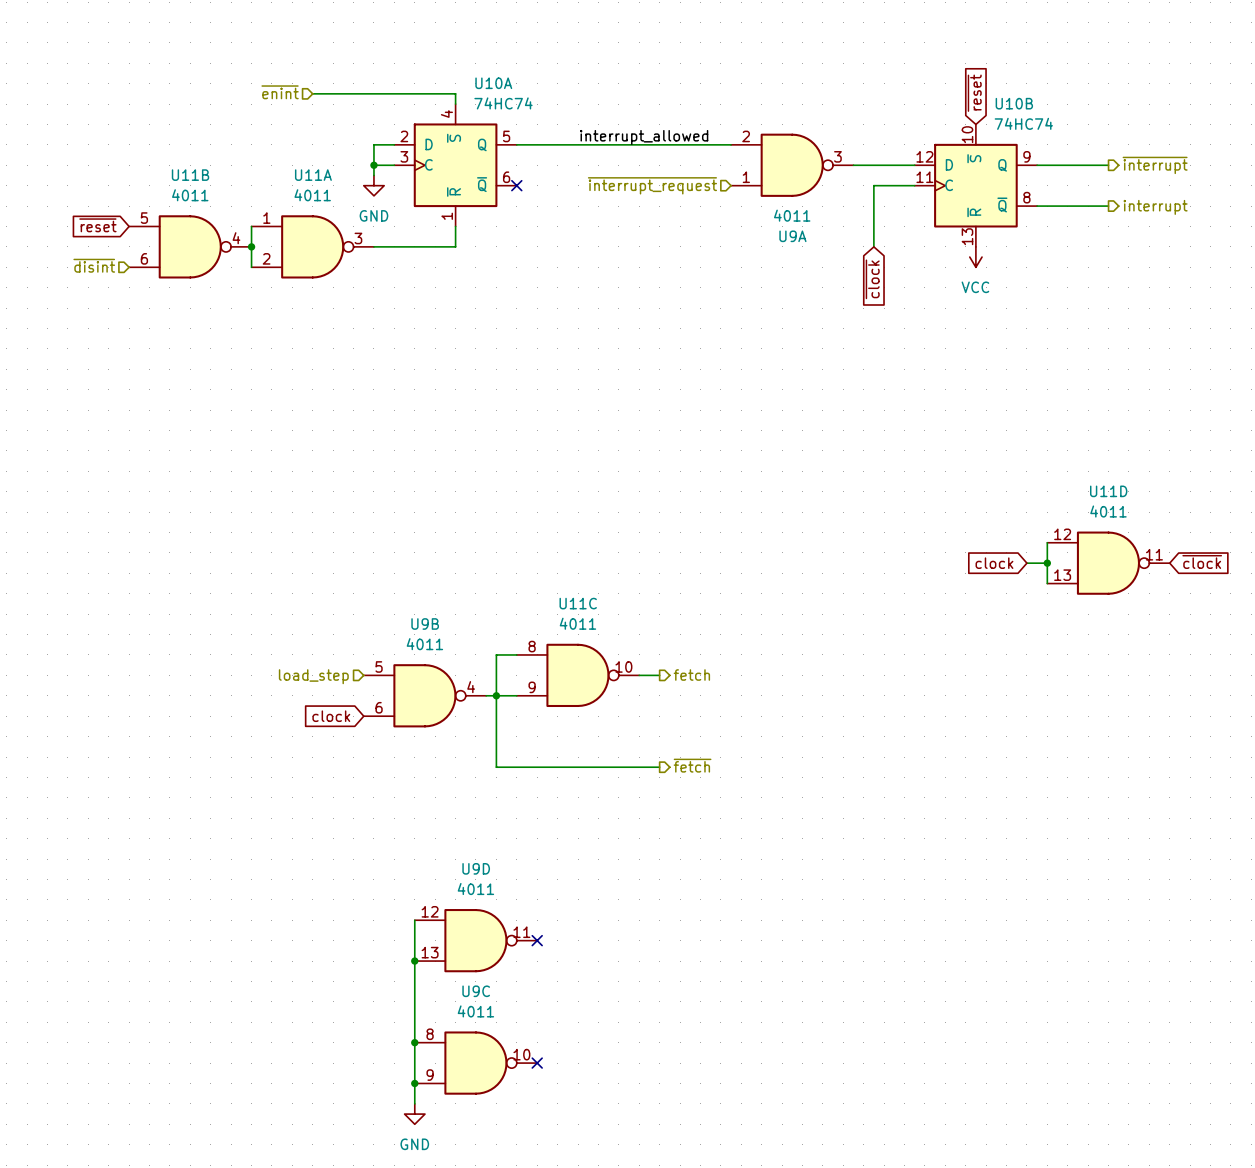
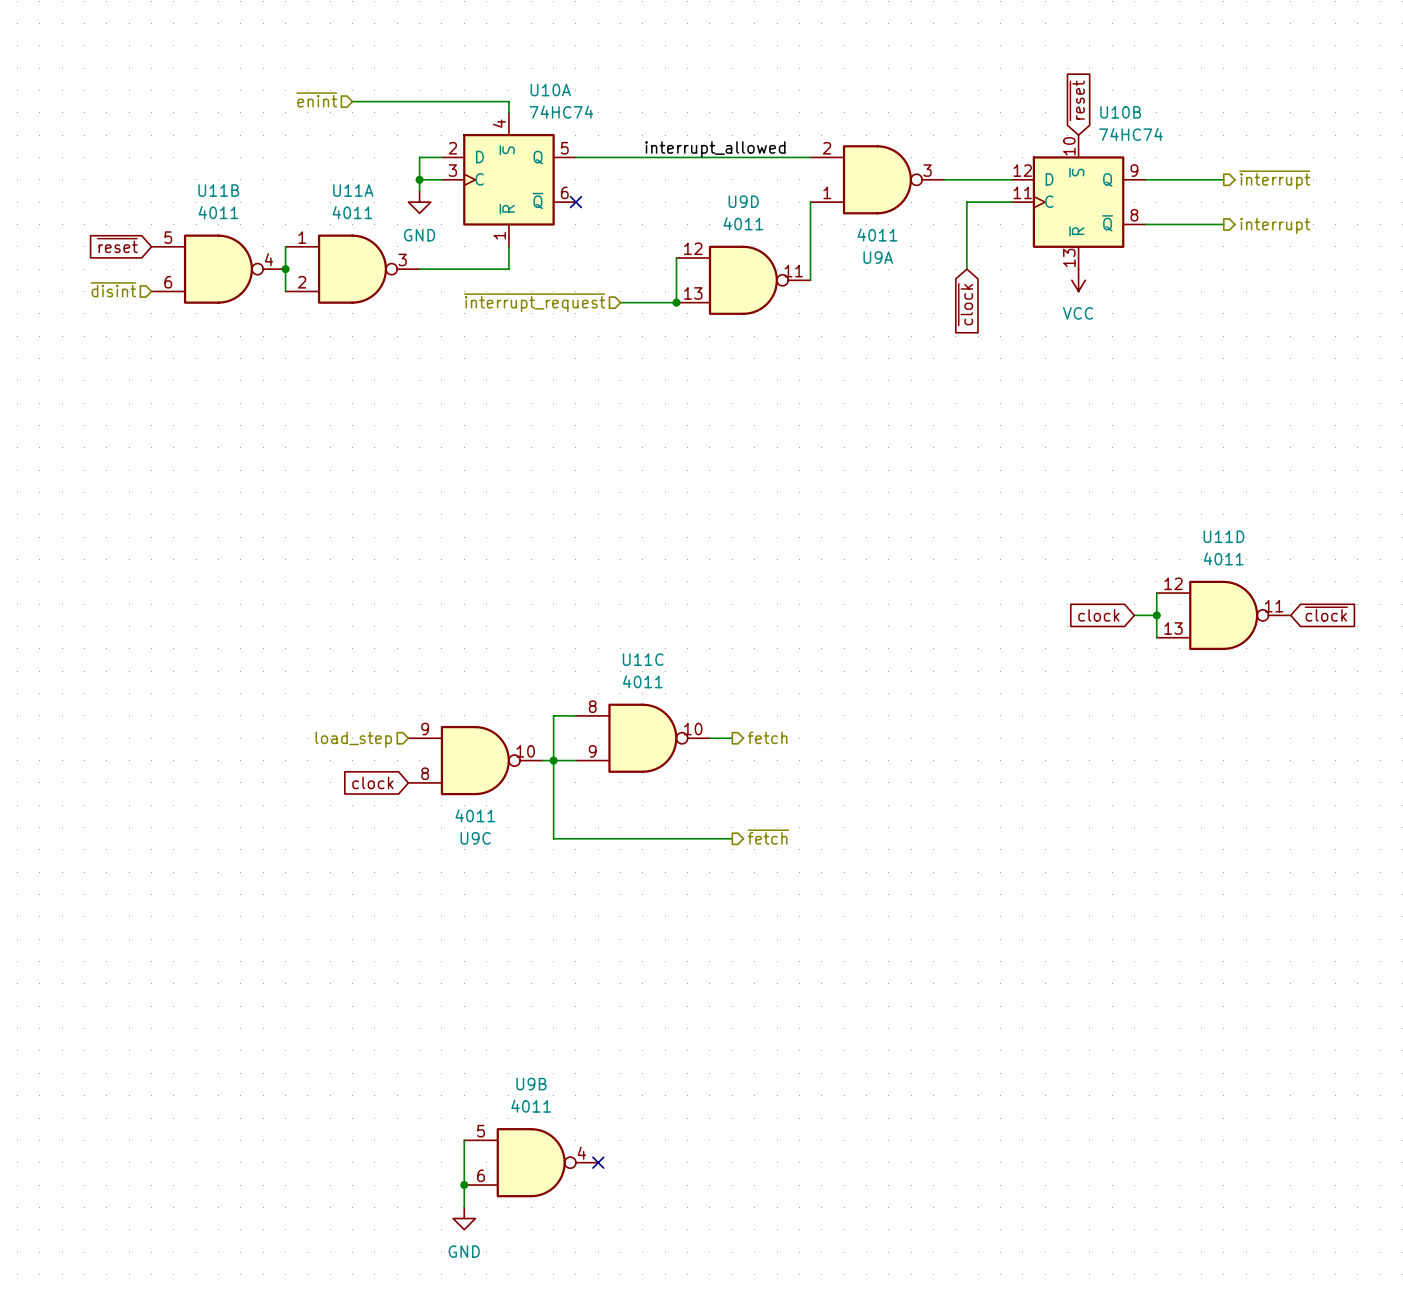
hierarchical label position: ~{interrupt_request} (652, 185) -> ~{interrupt_request} (534, 302)
wire: none -> (810, 202) (810, 280)
wire: none -> (676, 257) (676, 302) (620, 302)
junction: none -> (676, 302)
U9B position: (424, 695) -> (531, 1162)
wire: (414, 920) (414, 1042) -> none
U9D position: (475, 940) -> (743, 280)
no-connect mark: (537, 940) -> none
junction: (414, 961) -> none
junction: (414, 1042) -> none
U9C flip: as is (475, 1063) -> up-down (475, 760)
U9C position: (475, 1063) -> (475, 760)

